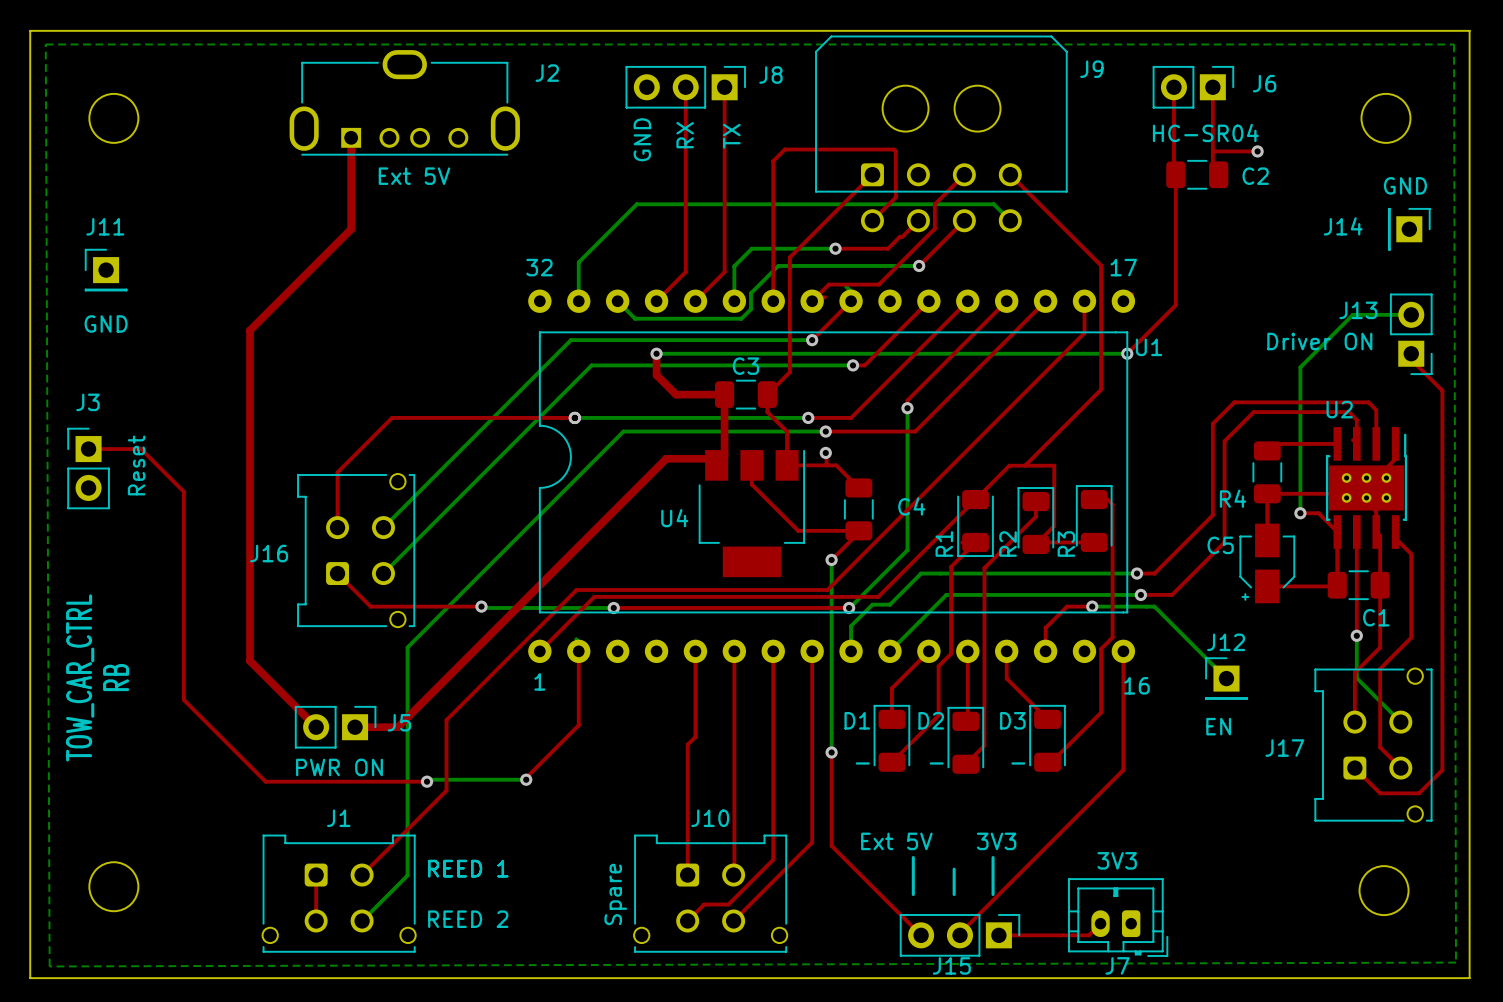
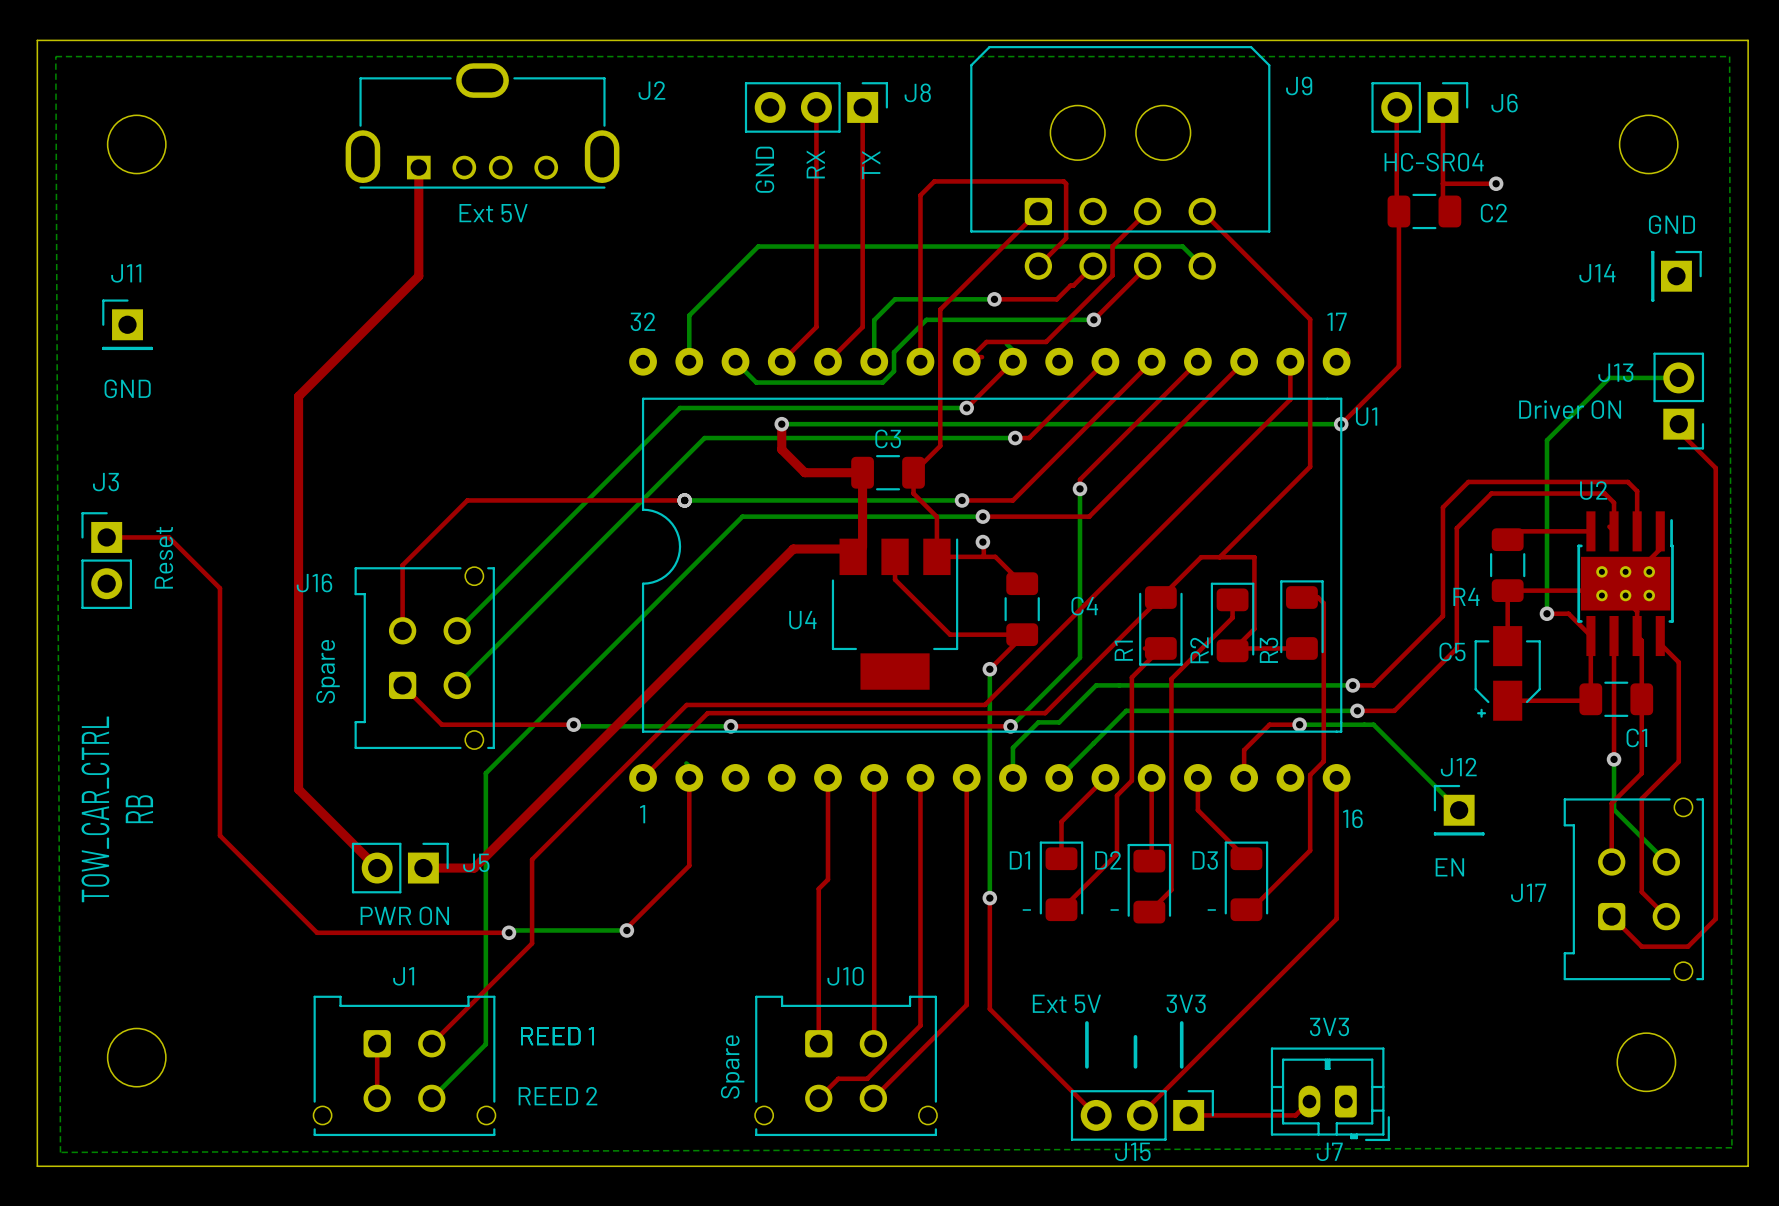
J16 name position: J16 (269, 553) -> J16 (314, 583)
text: none -> Spare (328, 671)

